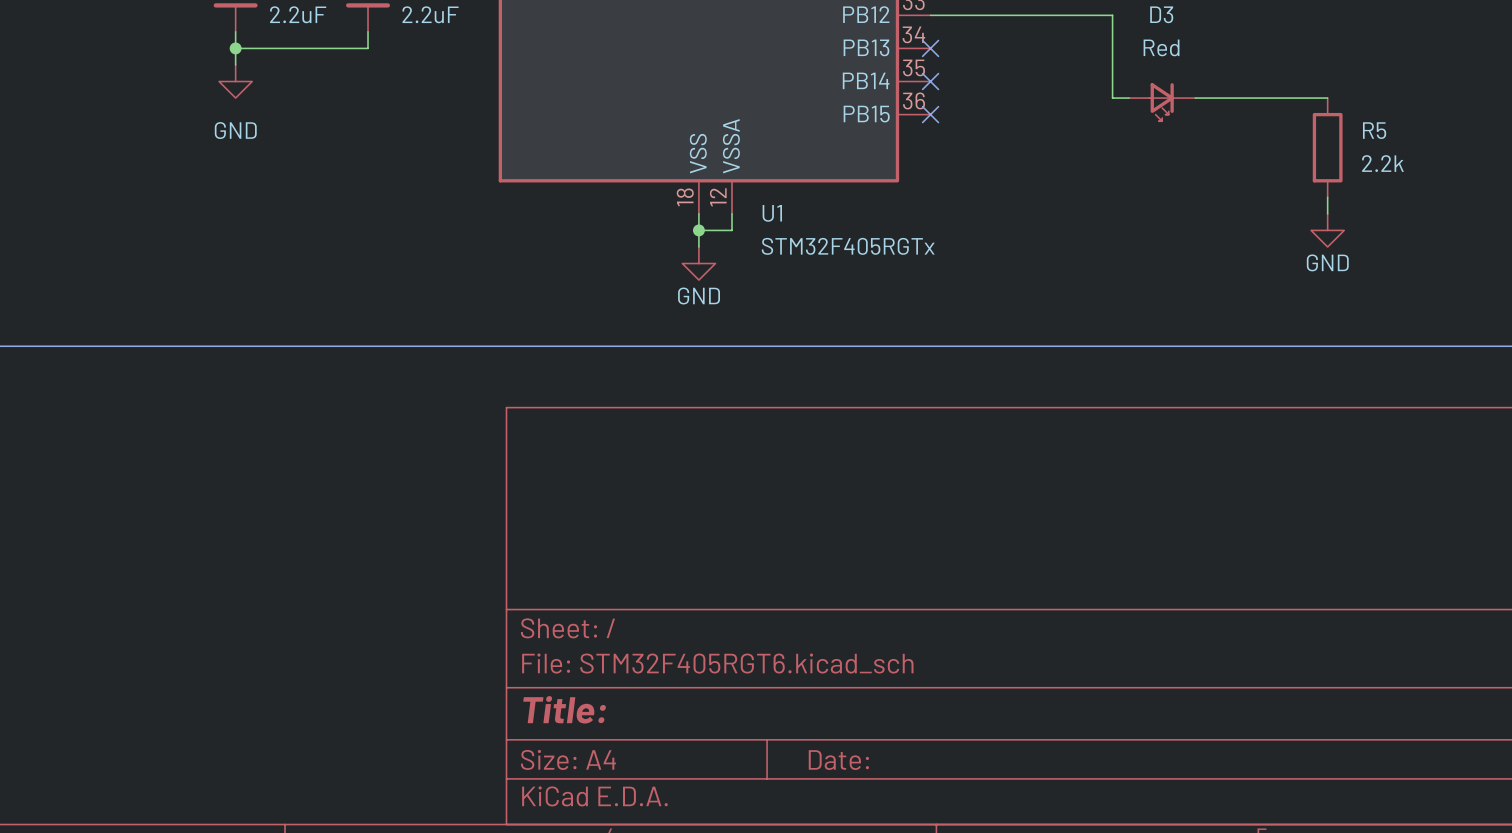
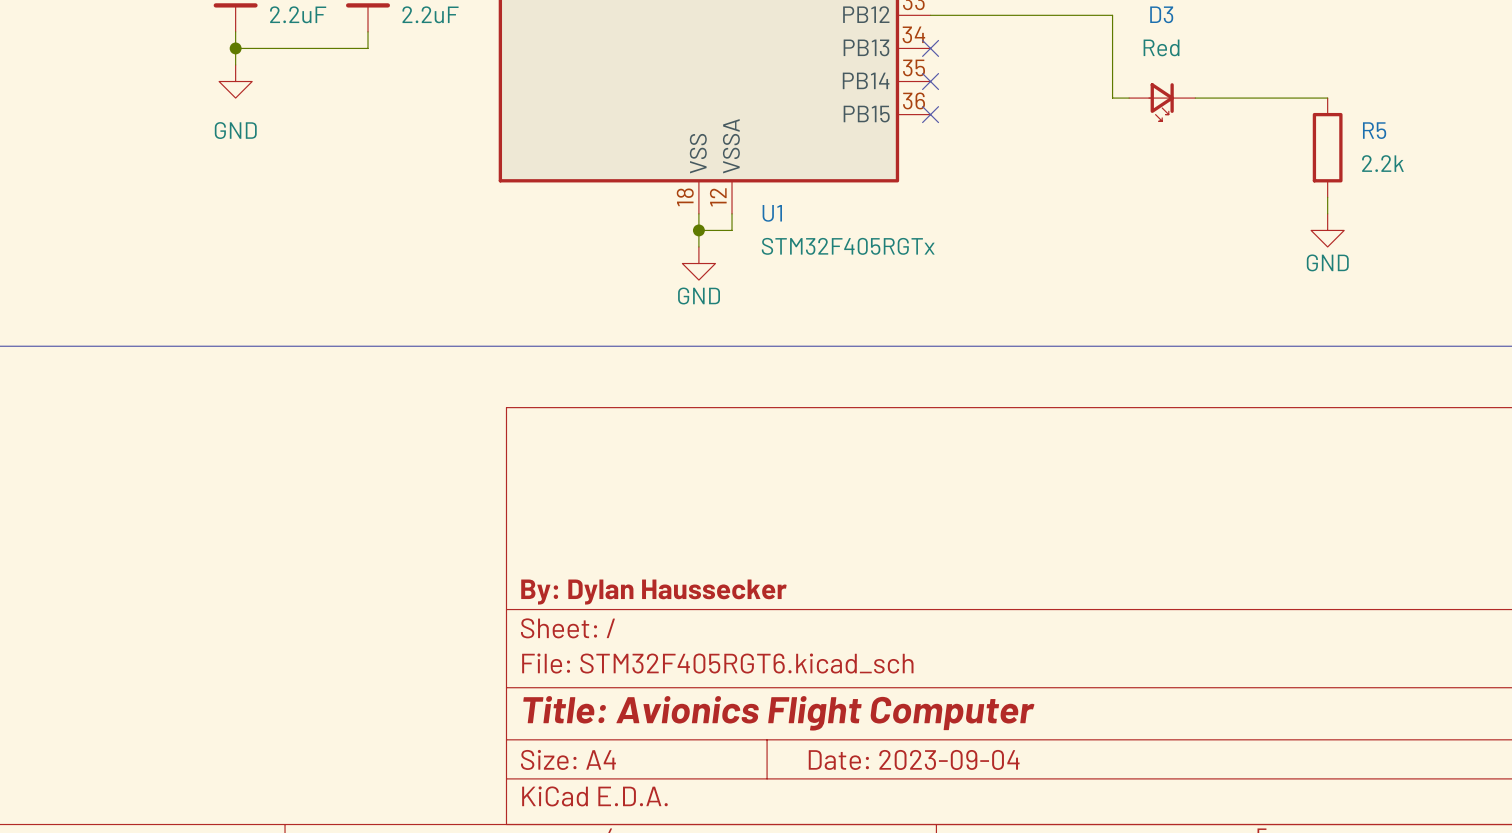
title block: none -> By: Dylan Haussecker (653, 592)
title block: Title: (564, 709) -> Title: Avionics Flight Computer (778, 713)
title block: Date: (838, 760) -> Date: 2023-09-04 (914, 759)

